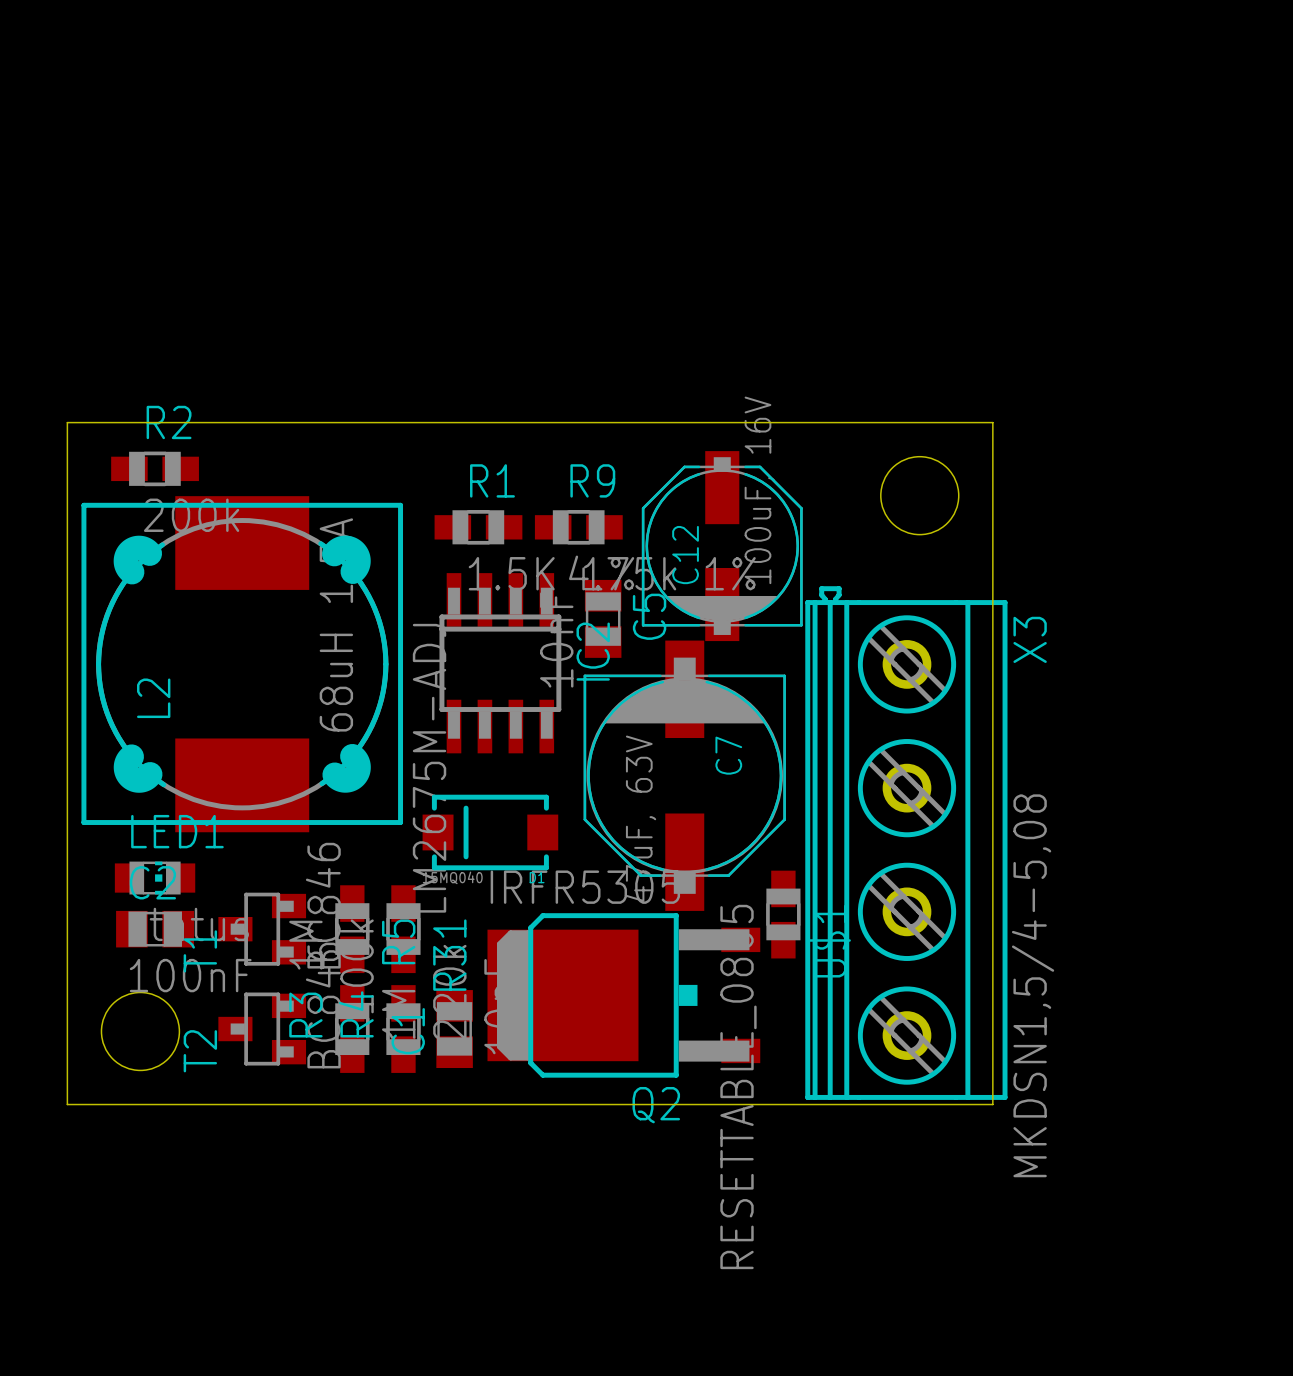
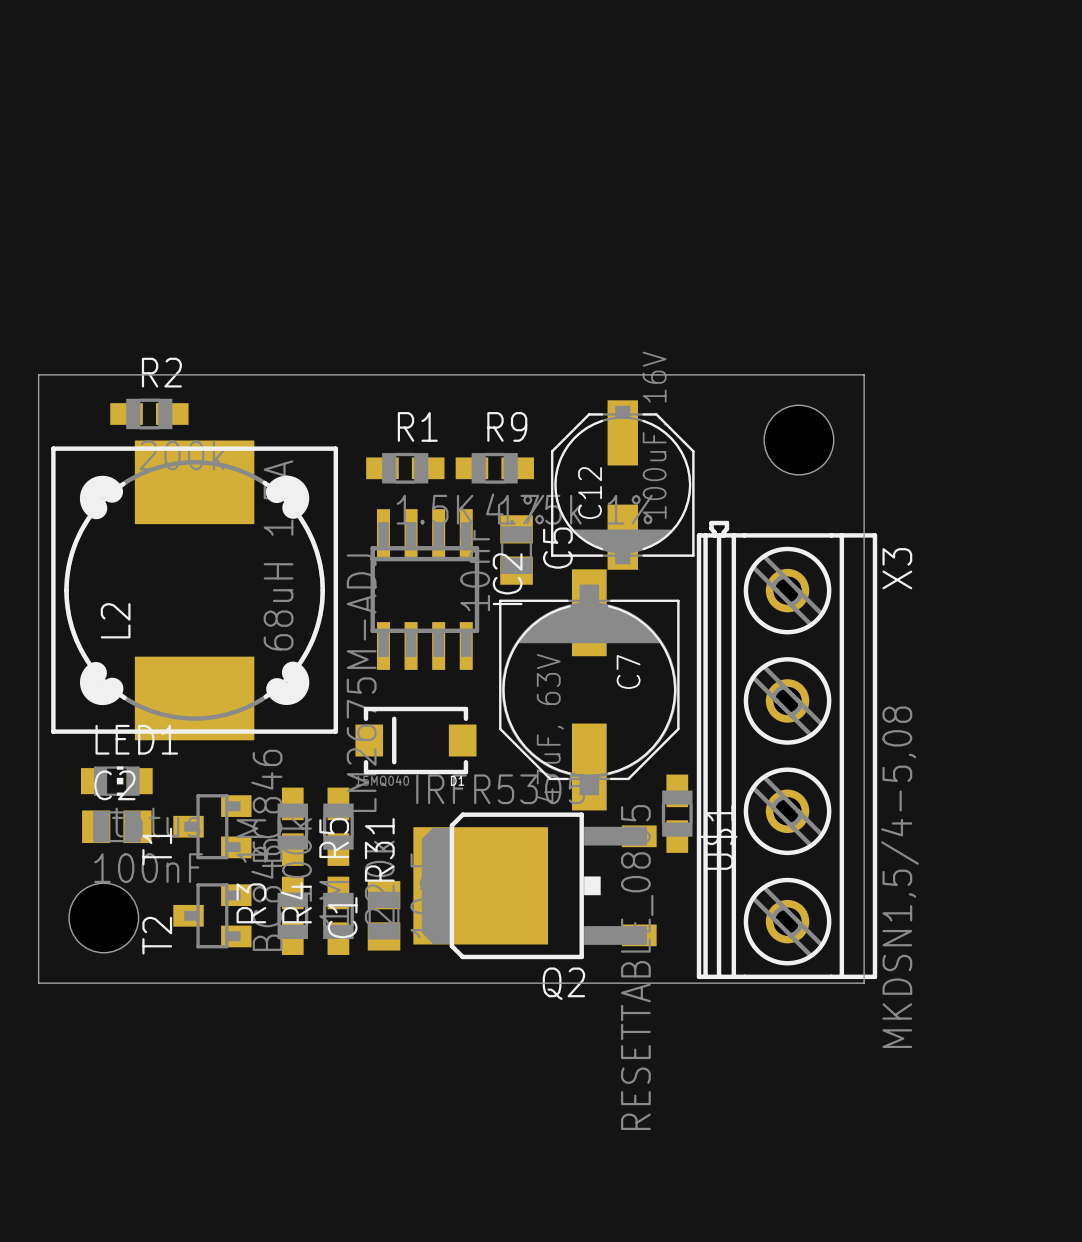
R2 position: (155, 468) -> (149, 414)

